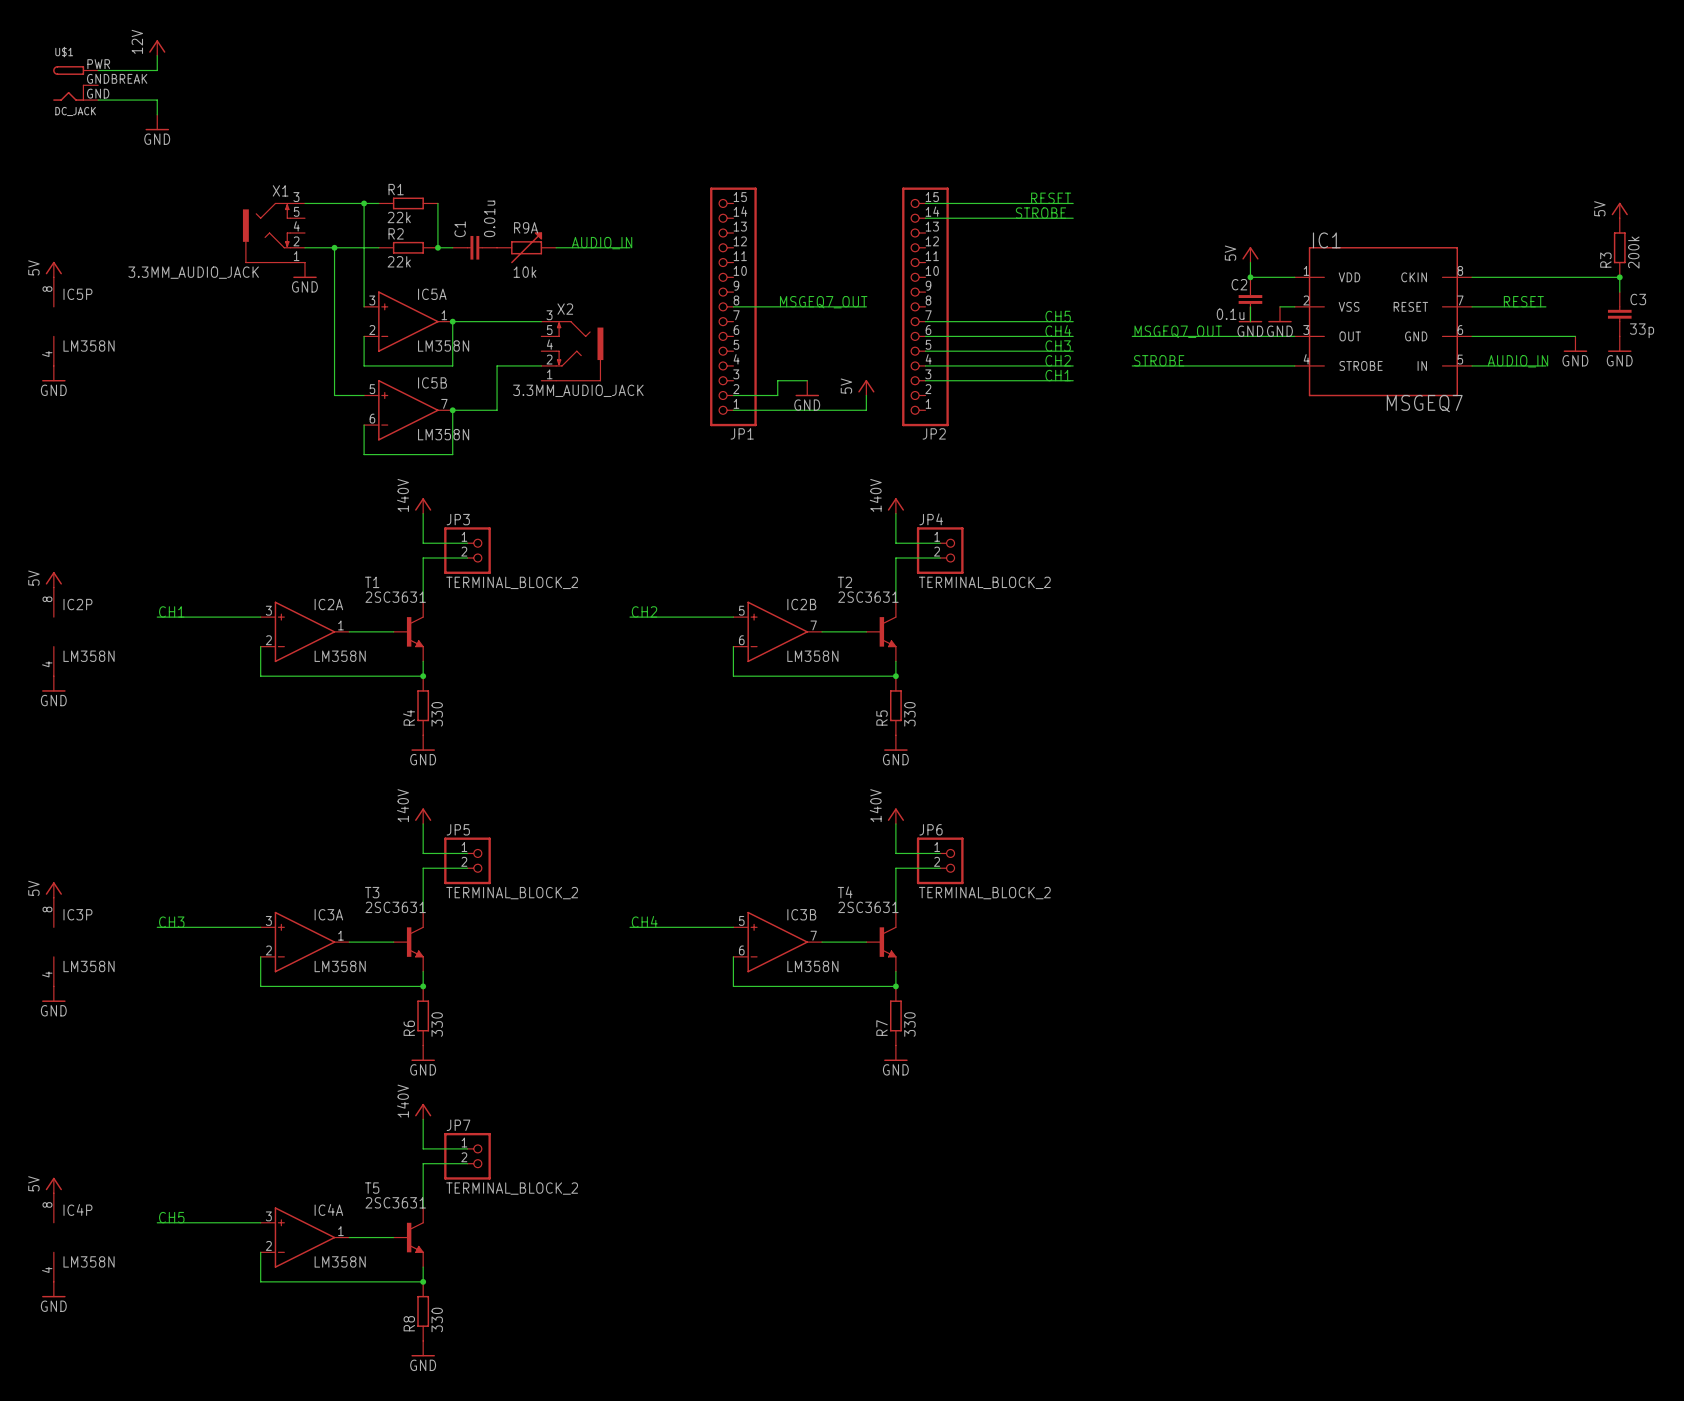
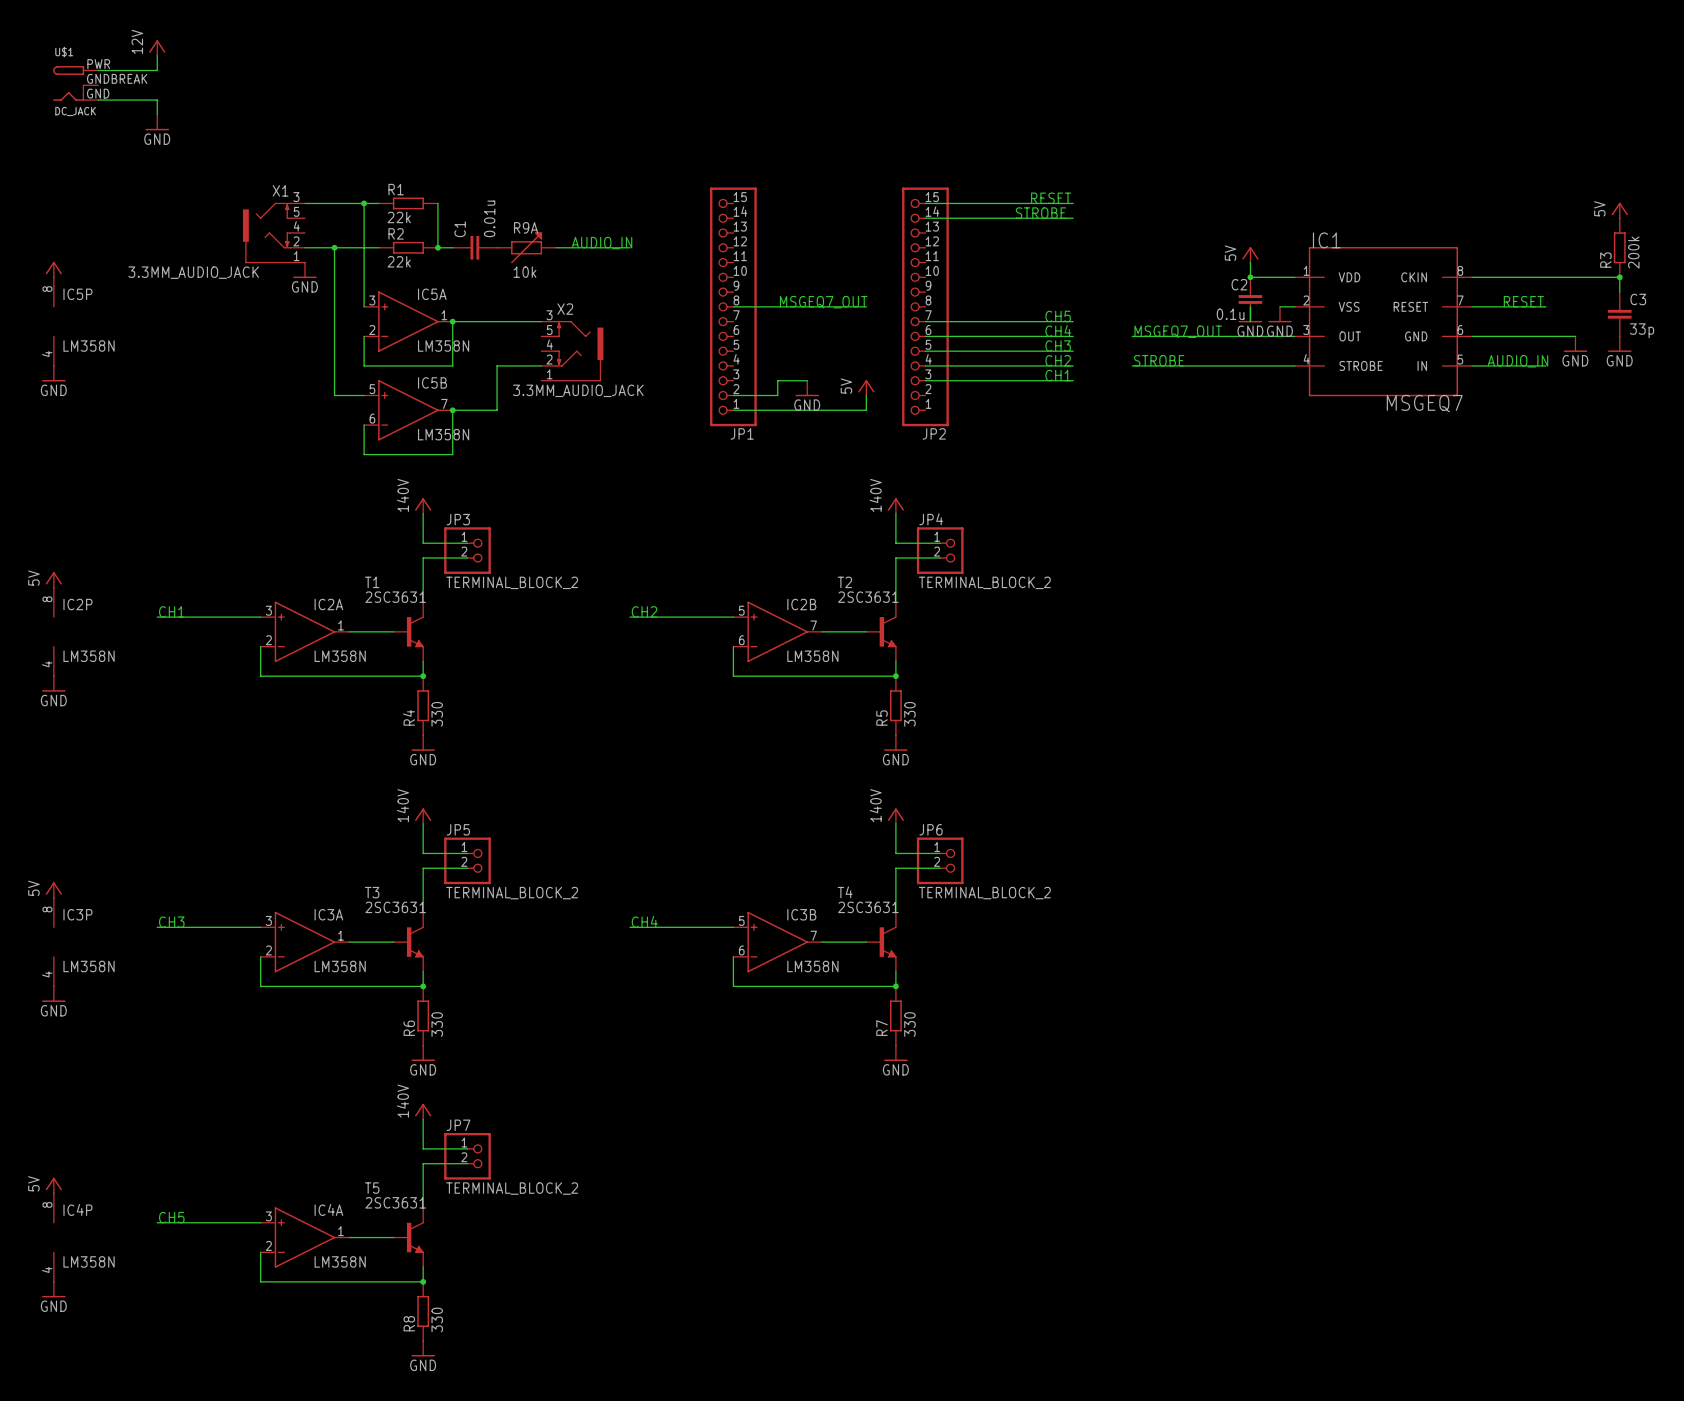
power symbol text: 5V (33, 267) -> none

